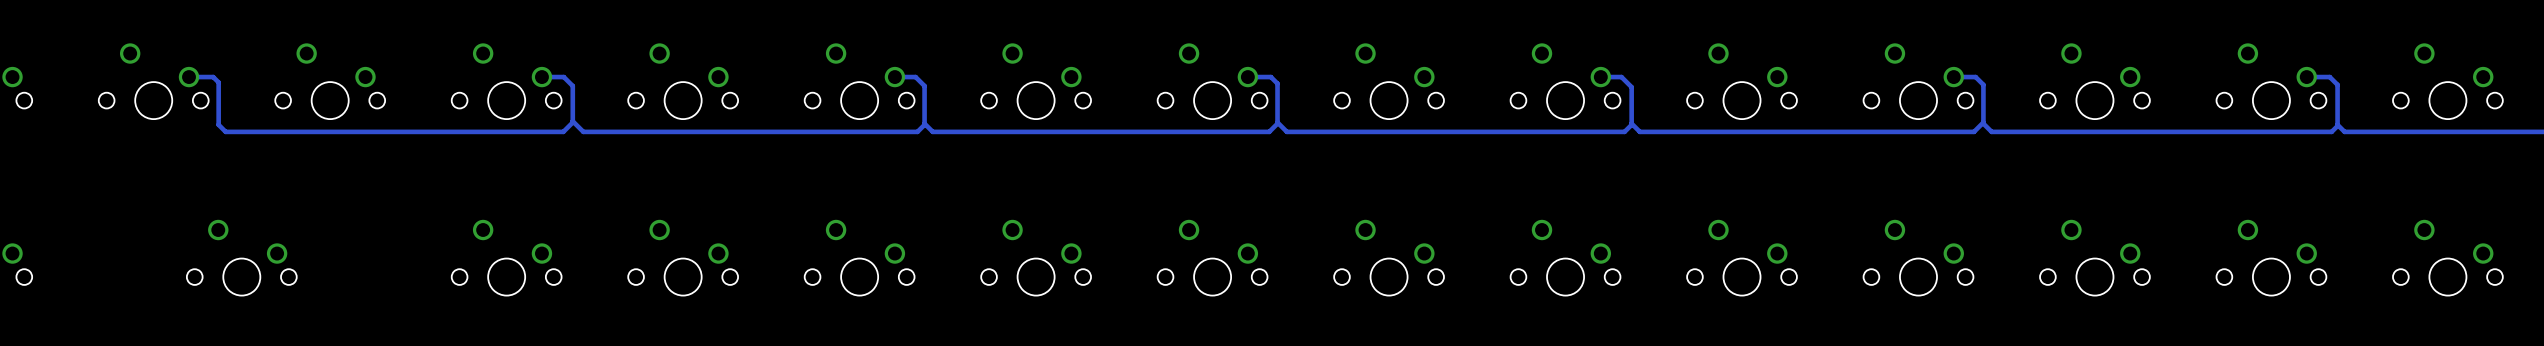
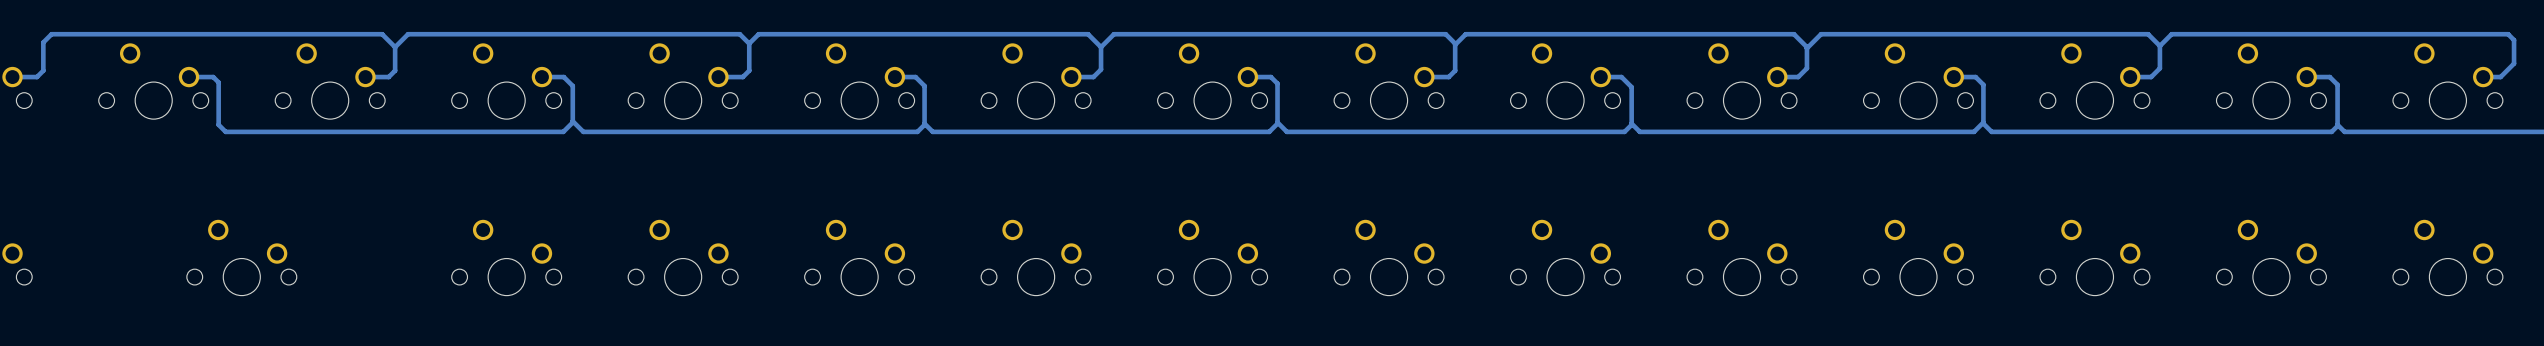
track: none -> (749, 43) (739, 34) (408, 34) (395, 47)
track: none -> (749, 43) (749, 70) (742, 77) (718, 77)
track: none -> (749, 43) (758, 34) (1088, 34) (1101, 47)
track: none -> (1455, 44) (1465, 34) (1794, 34) (1806, 47) (1806, 68) (1798, 77) (1777, 77)
track: none -> (2159, 45) (2148, 34) (1821, 34) (1806, 48)
track: none -> (2159, 45) (2159, 68) (2151, 77) (2130, 77)
track: none -> (2159, 45) (2171, 34) (2508, 34) (2514, 40) (2514, 63) (2500, 77) (2483, 77)
track: none -> (395, 47) (382, 34) (51, 34) (43, 42) (43, 70) (36, 77) (12, 77)
track: none -> (395, 47) (395, 70) (388, 77) (365, 77)
track: none -> (1101, 47) (1101, 69) (1093, 77) (1071, 77)
track: none -> (1101, 47) (1113, 34) (1445, 34) (1455, 43) (1455, 70) (1448, 77) (1424, 77)

